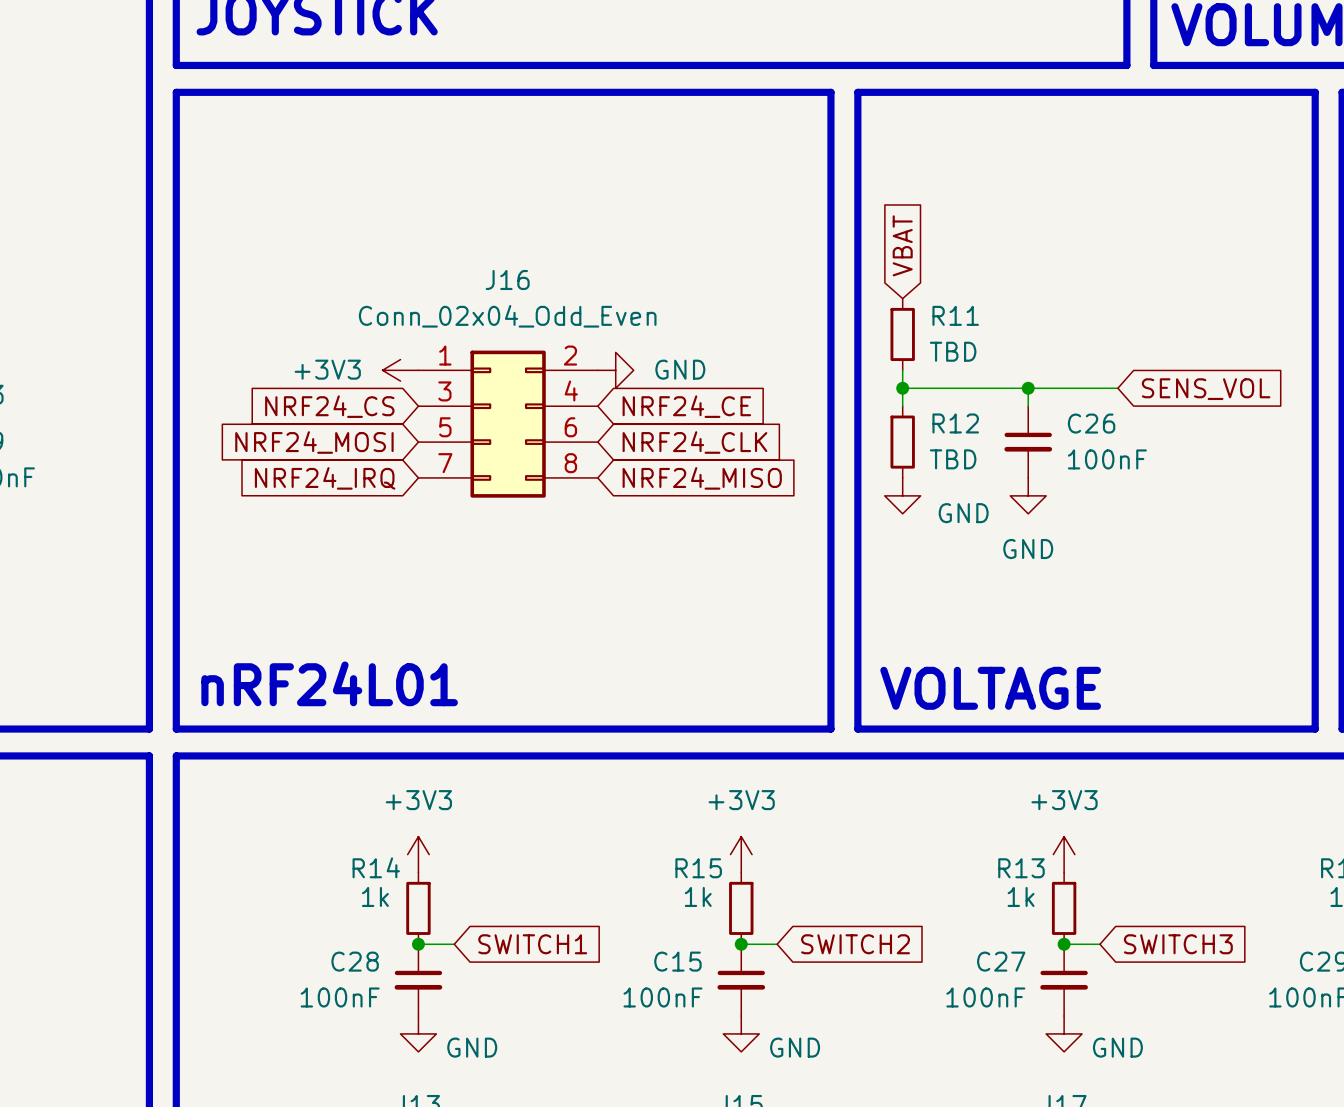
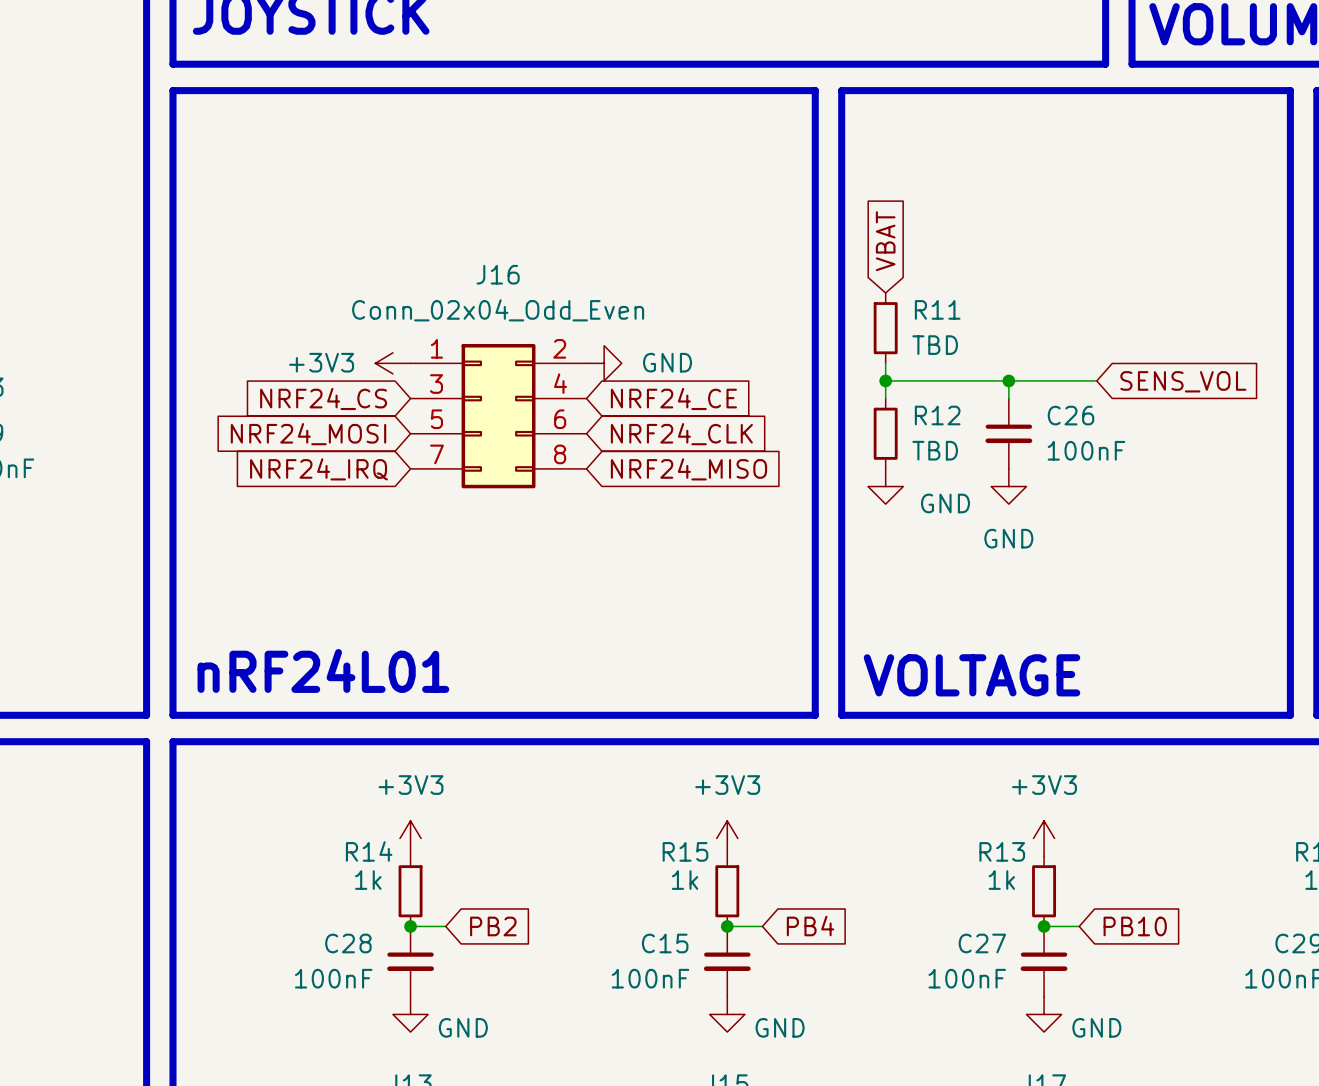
global label: SWITCH1 (532, 944) -> PB2 (493, 926)
global label: SWITCH2 (855, 944) -> PB4 (810, 926)
global label: SWITCH3 (1178, 944) -> PB10 (1135, 926)

